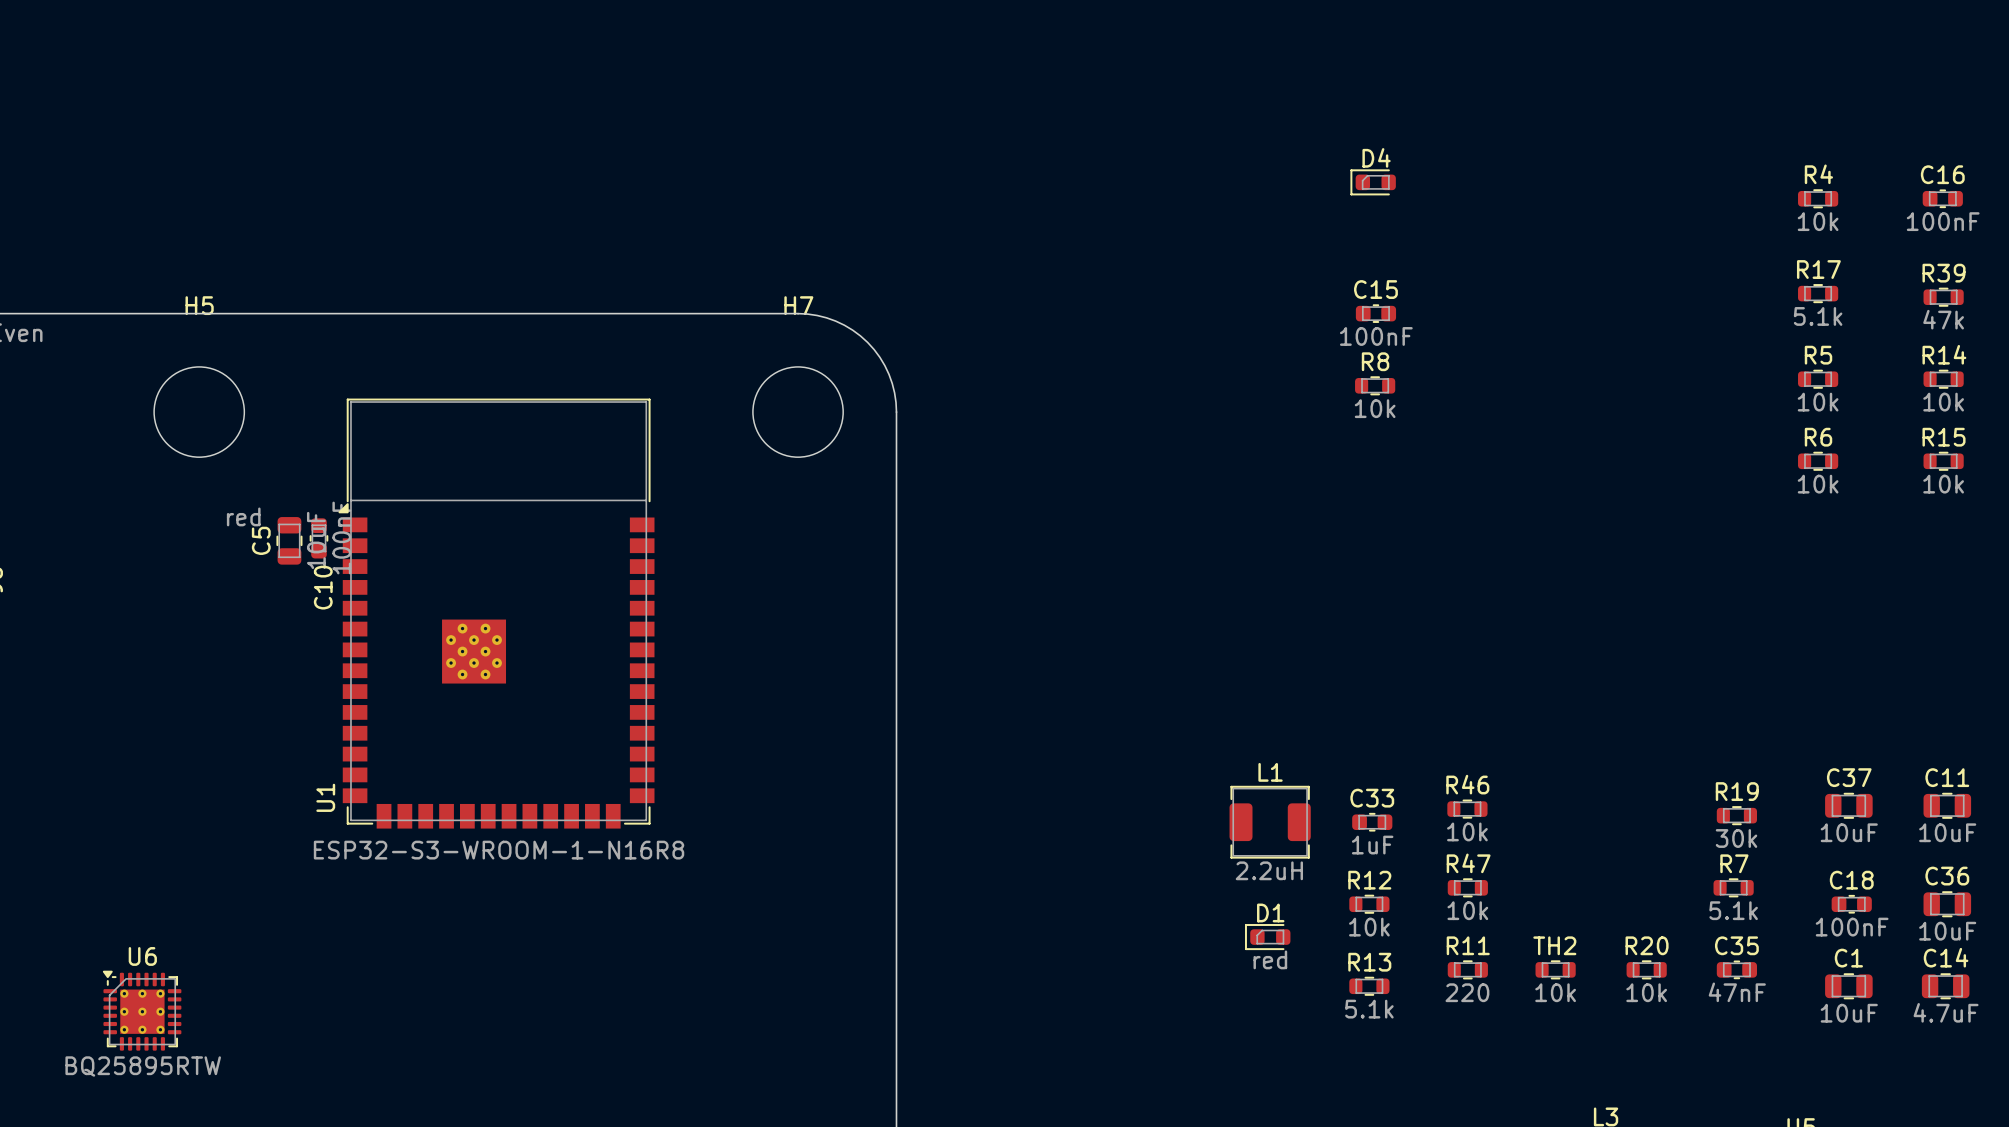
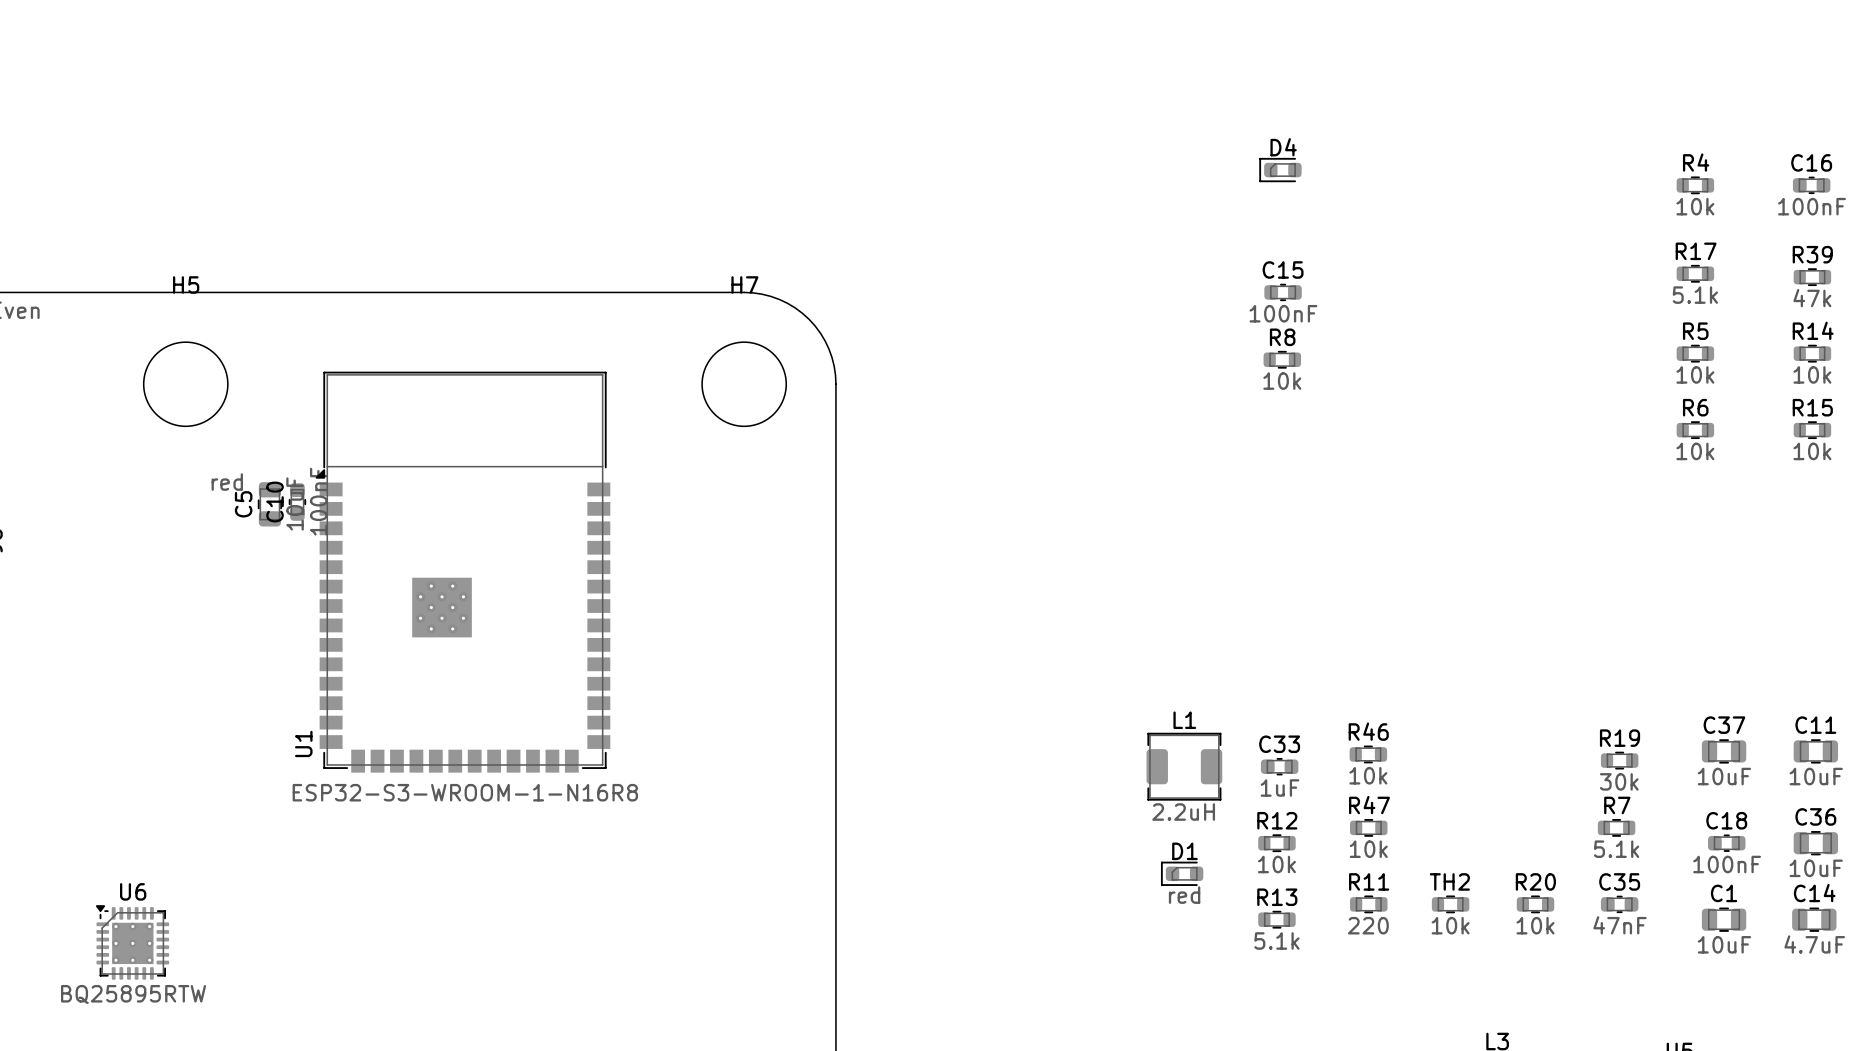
C10 name position: C10 (323, 587) -> C10 (275, 502)

